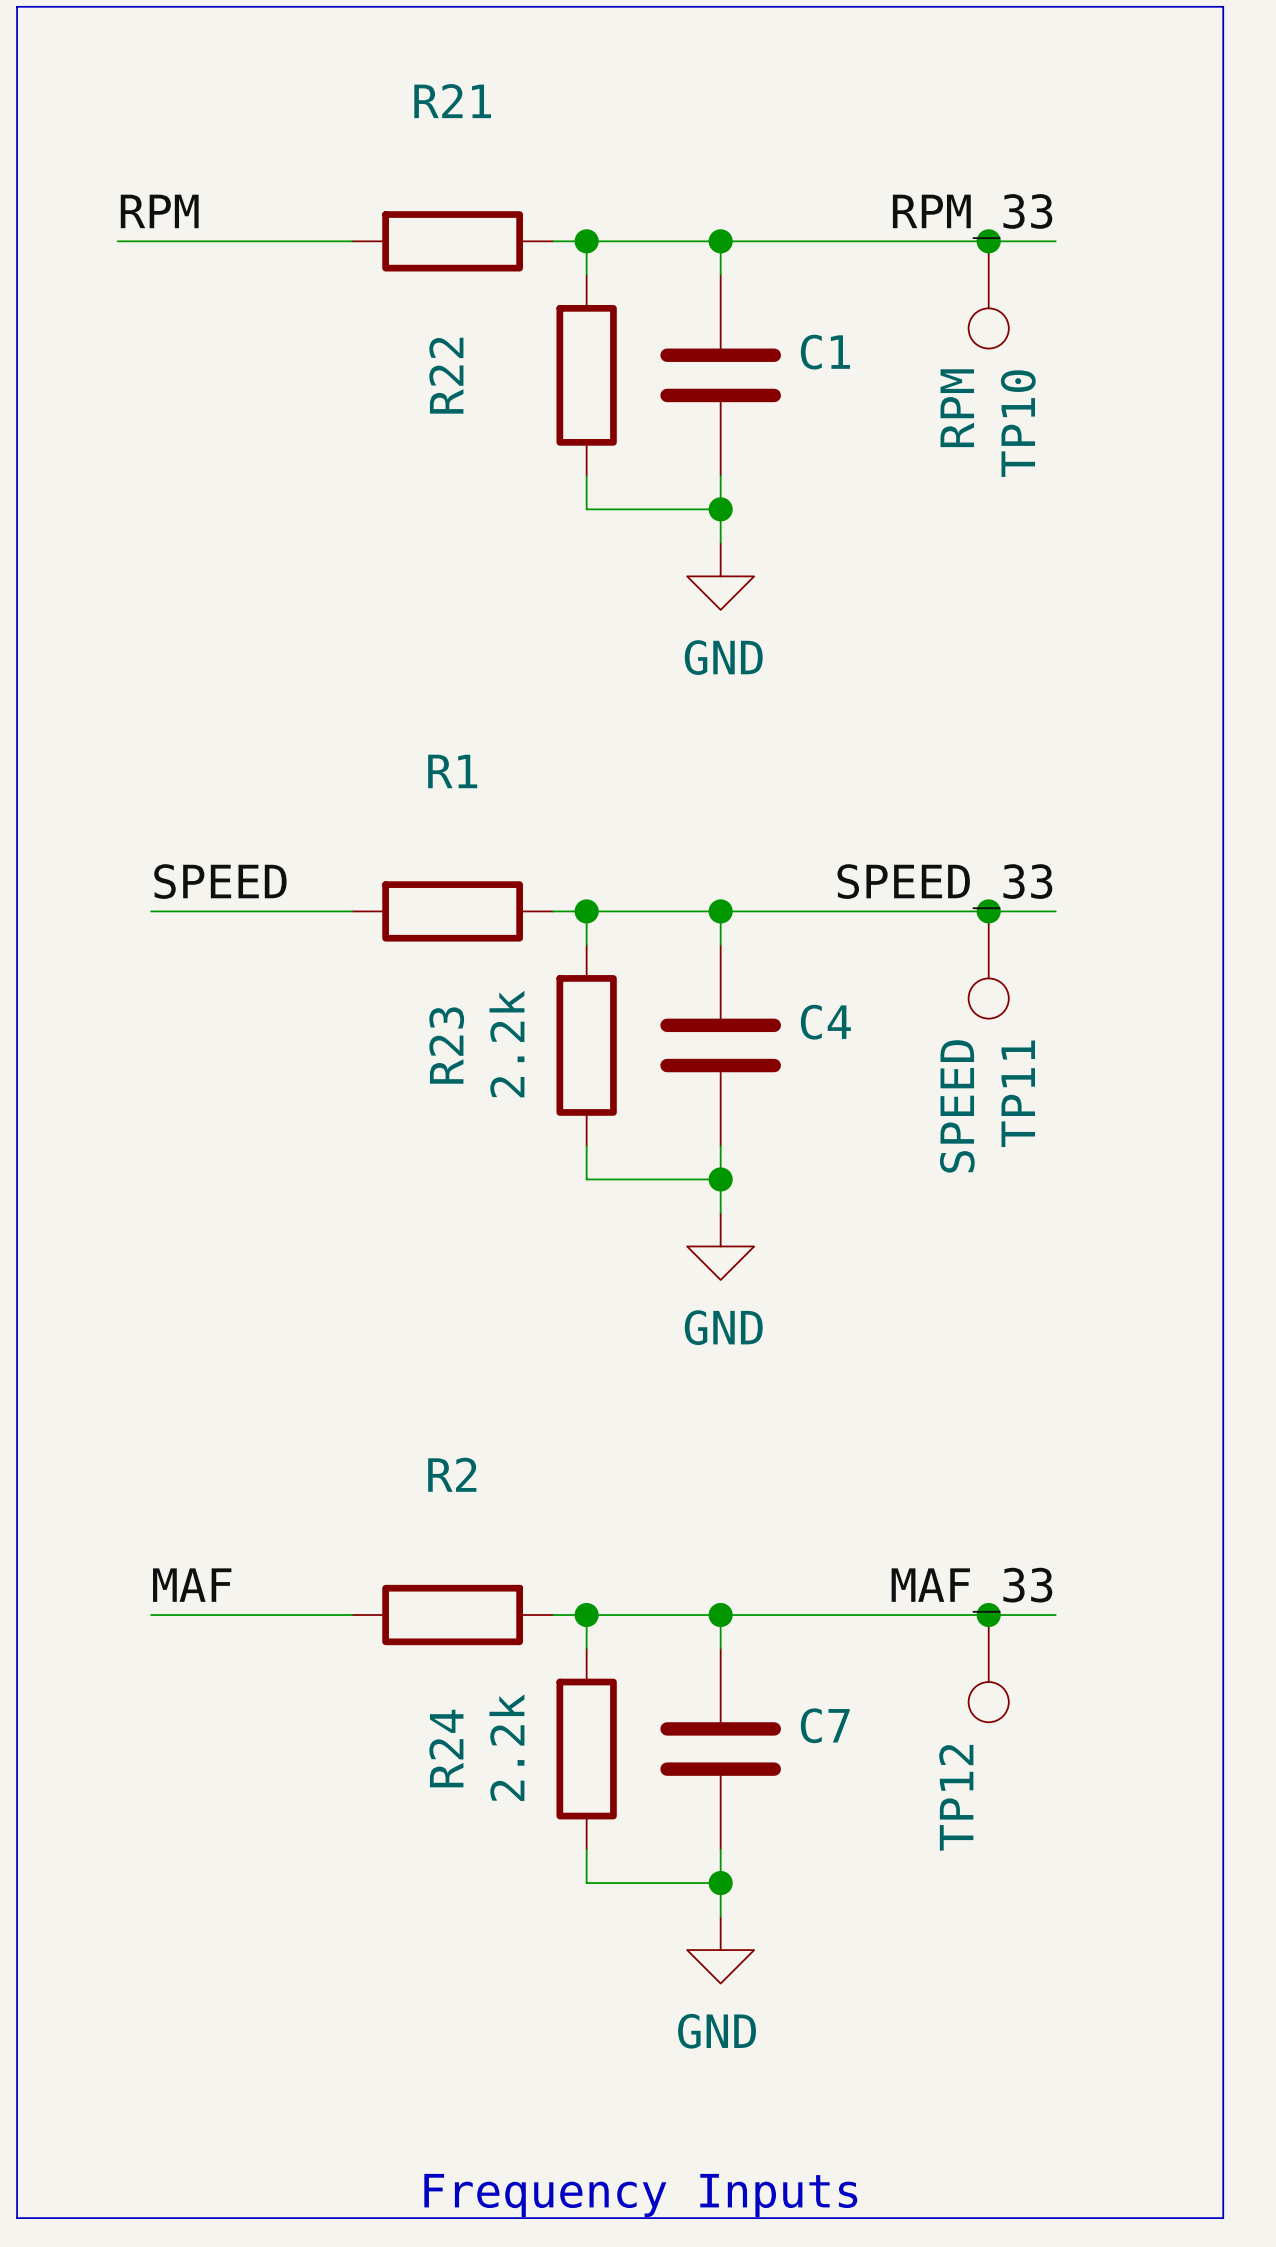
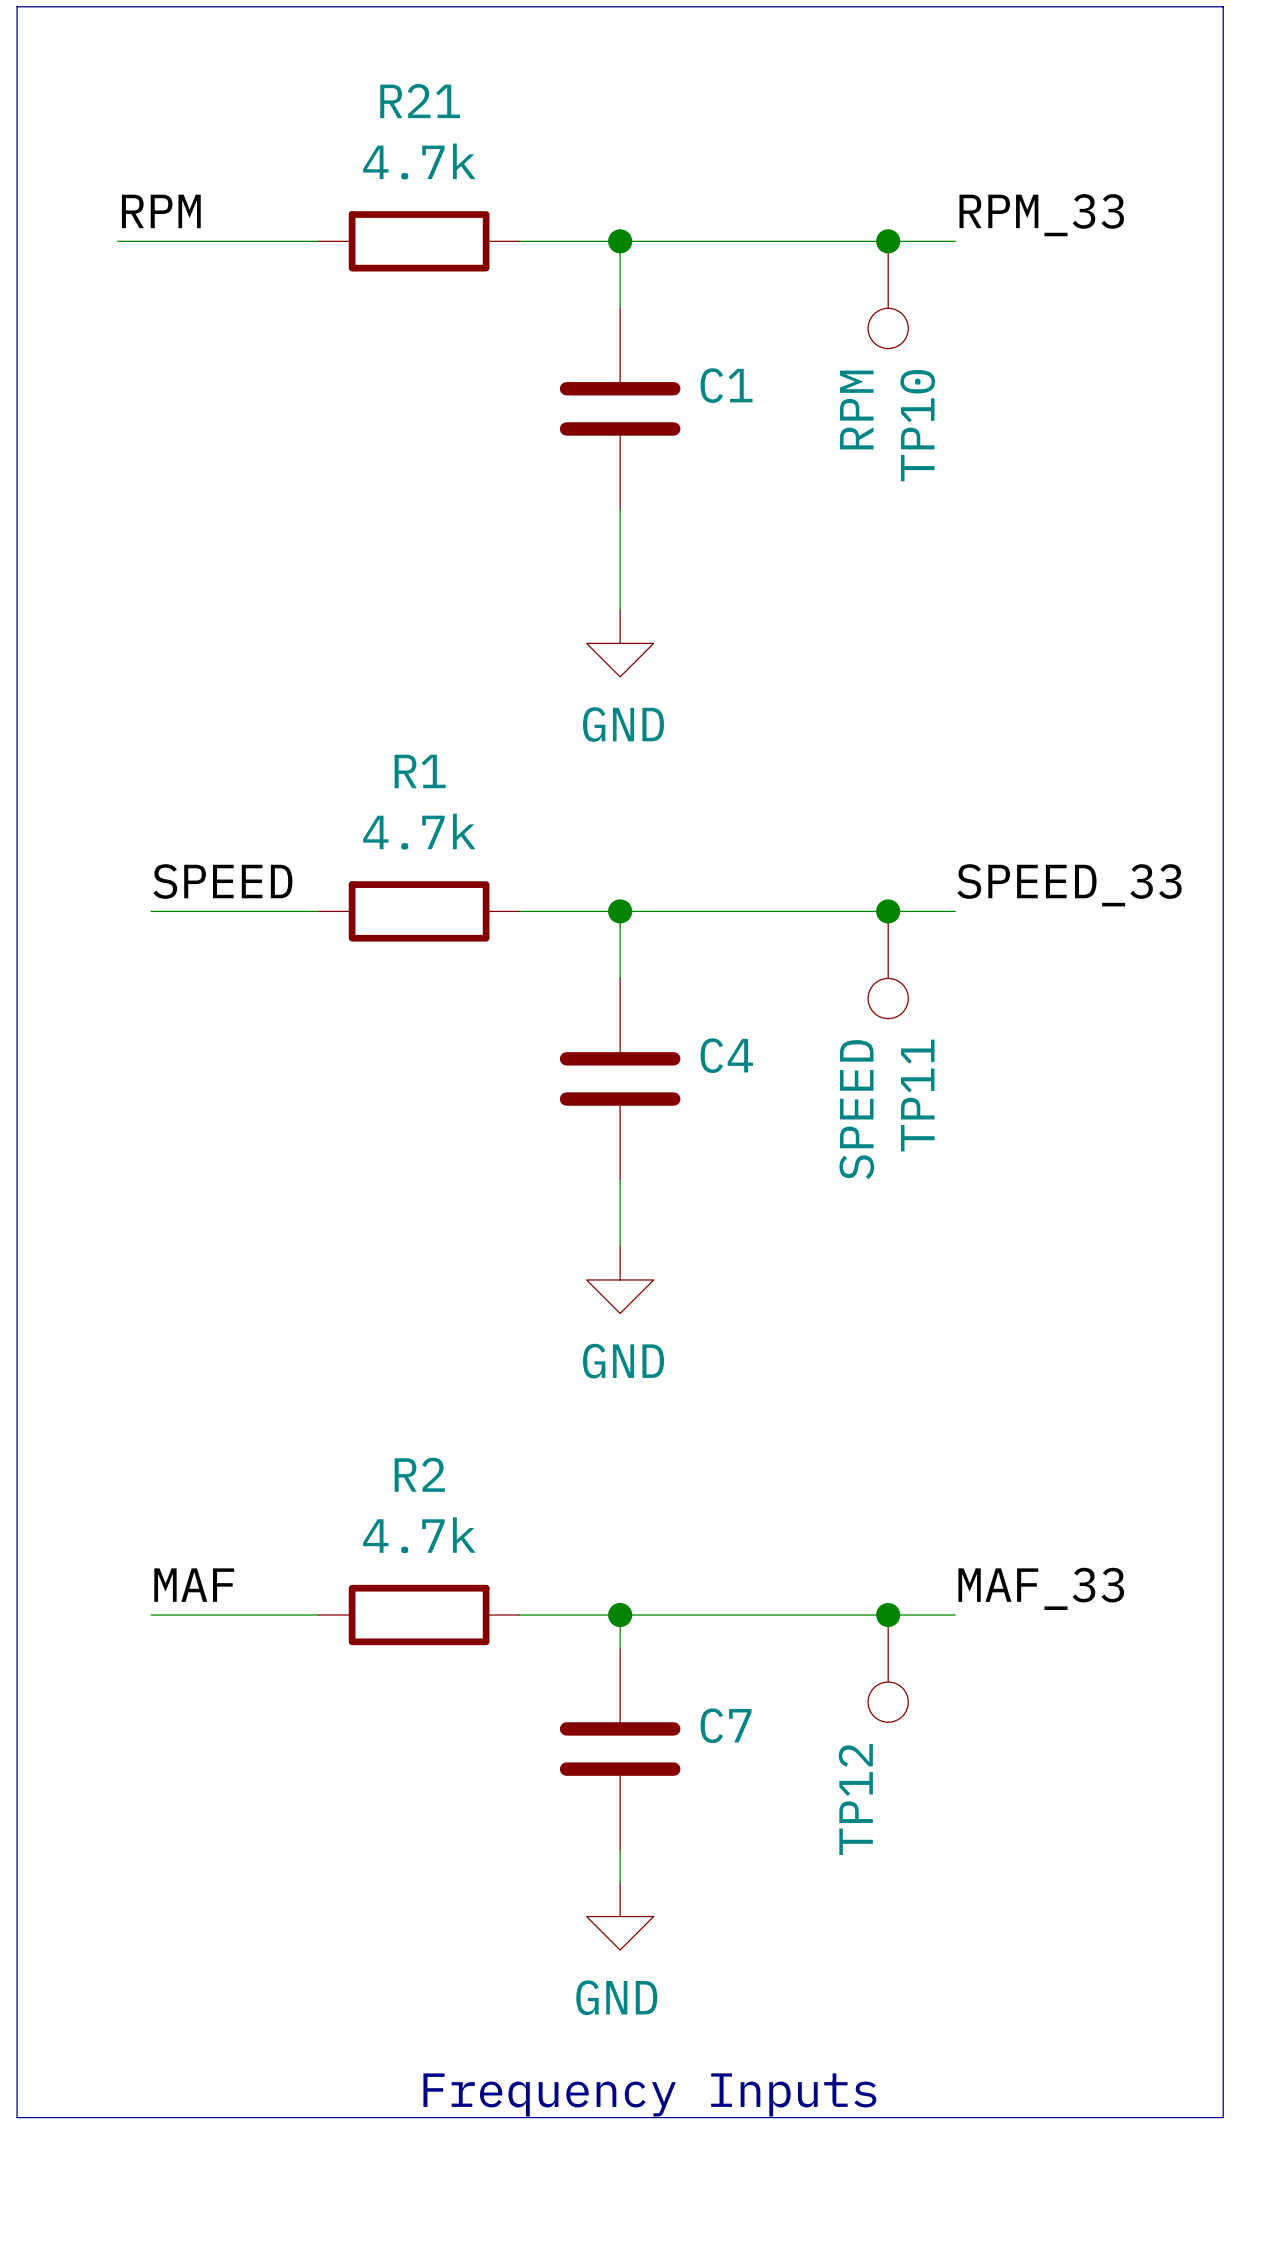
R21 value: none -> 4.7k (419, 161)
label position: RPM_33 (972, 216) -> RPM_33 (1041, 215)
R21 position: (452, 241) -> (419, 241)
wire: (586, 241) (586, 274) -> none
junction position: (586, 241) -> (620, 241)
wire: (720, 241) (720, 274) -> none
junction: (720, 241) -> none
junction: none -> (888, 241)
wire: (955, 241) (1055, 241) -> none
junction: (988, 241) -> none
TP10 position: (988, 294) -> (888, 294)
R22: (586, 375) -> none
C1 position: (720, 375) -> (620, 408)
wire: (586, 475) (586, 509) (720, 509) -> none
wire: (720, 475) (720, 542) -> (620, 241) (620, 308)
wire: none -> (620, 509) (620, 609)
junction: (720, 509) -> none
power symbol position: GND (720, 576) -> GND (620, 643)
R1 value: none -> 4.7k (419, 831)
label position: SPEED_33 (944, 886) -> SPEED_33 (1069, 885)
R1 position: (452, 911) -> (419, 911)
wire: (586, 911) (586, 944) -> none
junction position: (586, 911) -> (620, 911)
wire: (720, 911) (720, 944) -> none
junction: (720, 911) -> none
junction: none -> (888, 911)
wire: (955, 911) (1055, 911) -> none
junction: (988, 911) -> none
TP11 position: (988, 965) -> (888, 965)
R23: 2.2k (586, 1045) -> none
C4 position: (720, 1045) -> (620, 1078)
wire: (586, 1145) (586, 1179) (720, 1179) -> none
wire: (720, 1145) (720, 1212) -> (620, 911) (620, 978)
wire: none -> (620, 1179) (620, 1246)
junction: (720, 1179) -> none
power symbol position: GND (720, 1246) -> GND (620, 1279)
R2 value: none -> 4.7k (419, 1535)
label position: MAF_33 (971, 1590) -> MAF_33 (1041, 1588)
R2 position: (452, 1615) -> (419, 1615)
wire: (586, 1615) (586, 1648) -> (620, 1615) (620, 1648)
junction position: (586, 1615) -> (620, 1615)
wire: (720, 1615) (720, 1648) -> (620, 1849) (620, 1883)
junction: (720, 1615) -> none
junction: none -> (888, 1615)
wire: (955, 1615) (1055, 1615) -> none
junction: (988, 1615) -> none
TP12 position: (988, 1668) -> (888, 1668)
R24: 2.2k (586, 1749) -> none
C7 position: (720, 1749) -> (620, 1749)
wire: (586, 1849) (586, 1883) (720, 1883) -> none
wire: (720, 1849) (720, 1916) -> none
junction: (720, 1883) -> none
power symbol position: GND (720, 1950) -> GND (620, 1916)
line: (17, 2117) (17, 2218) (1223, 2218) (1223, 2117) -> (17, 2117) (1223, 2117)
text position: Frequency Inputs (640, 2195) -> Frequency Inputs (649, 2094)

